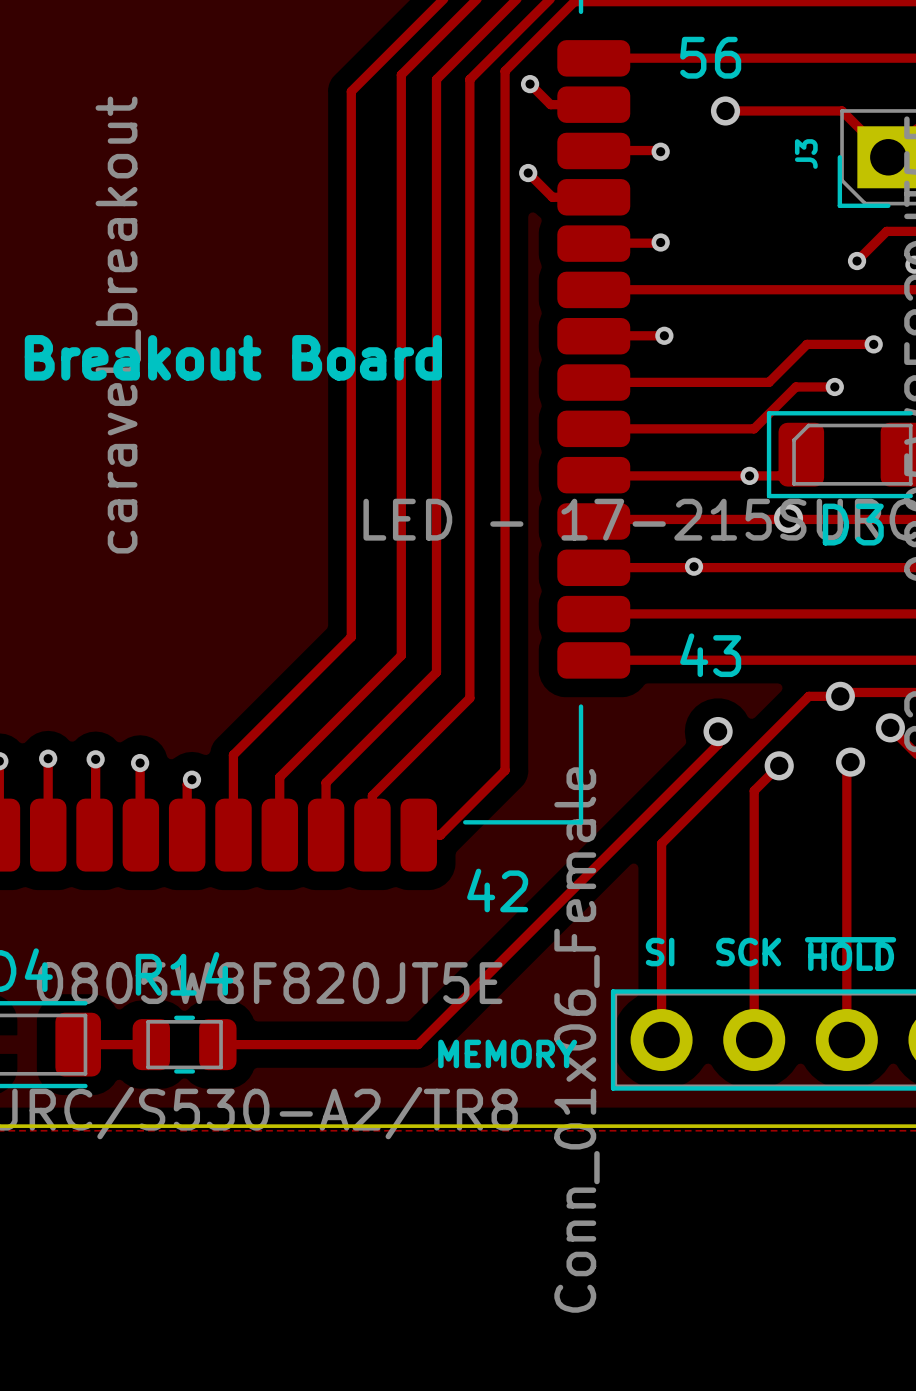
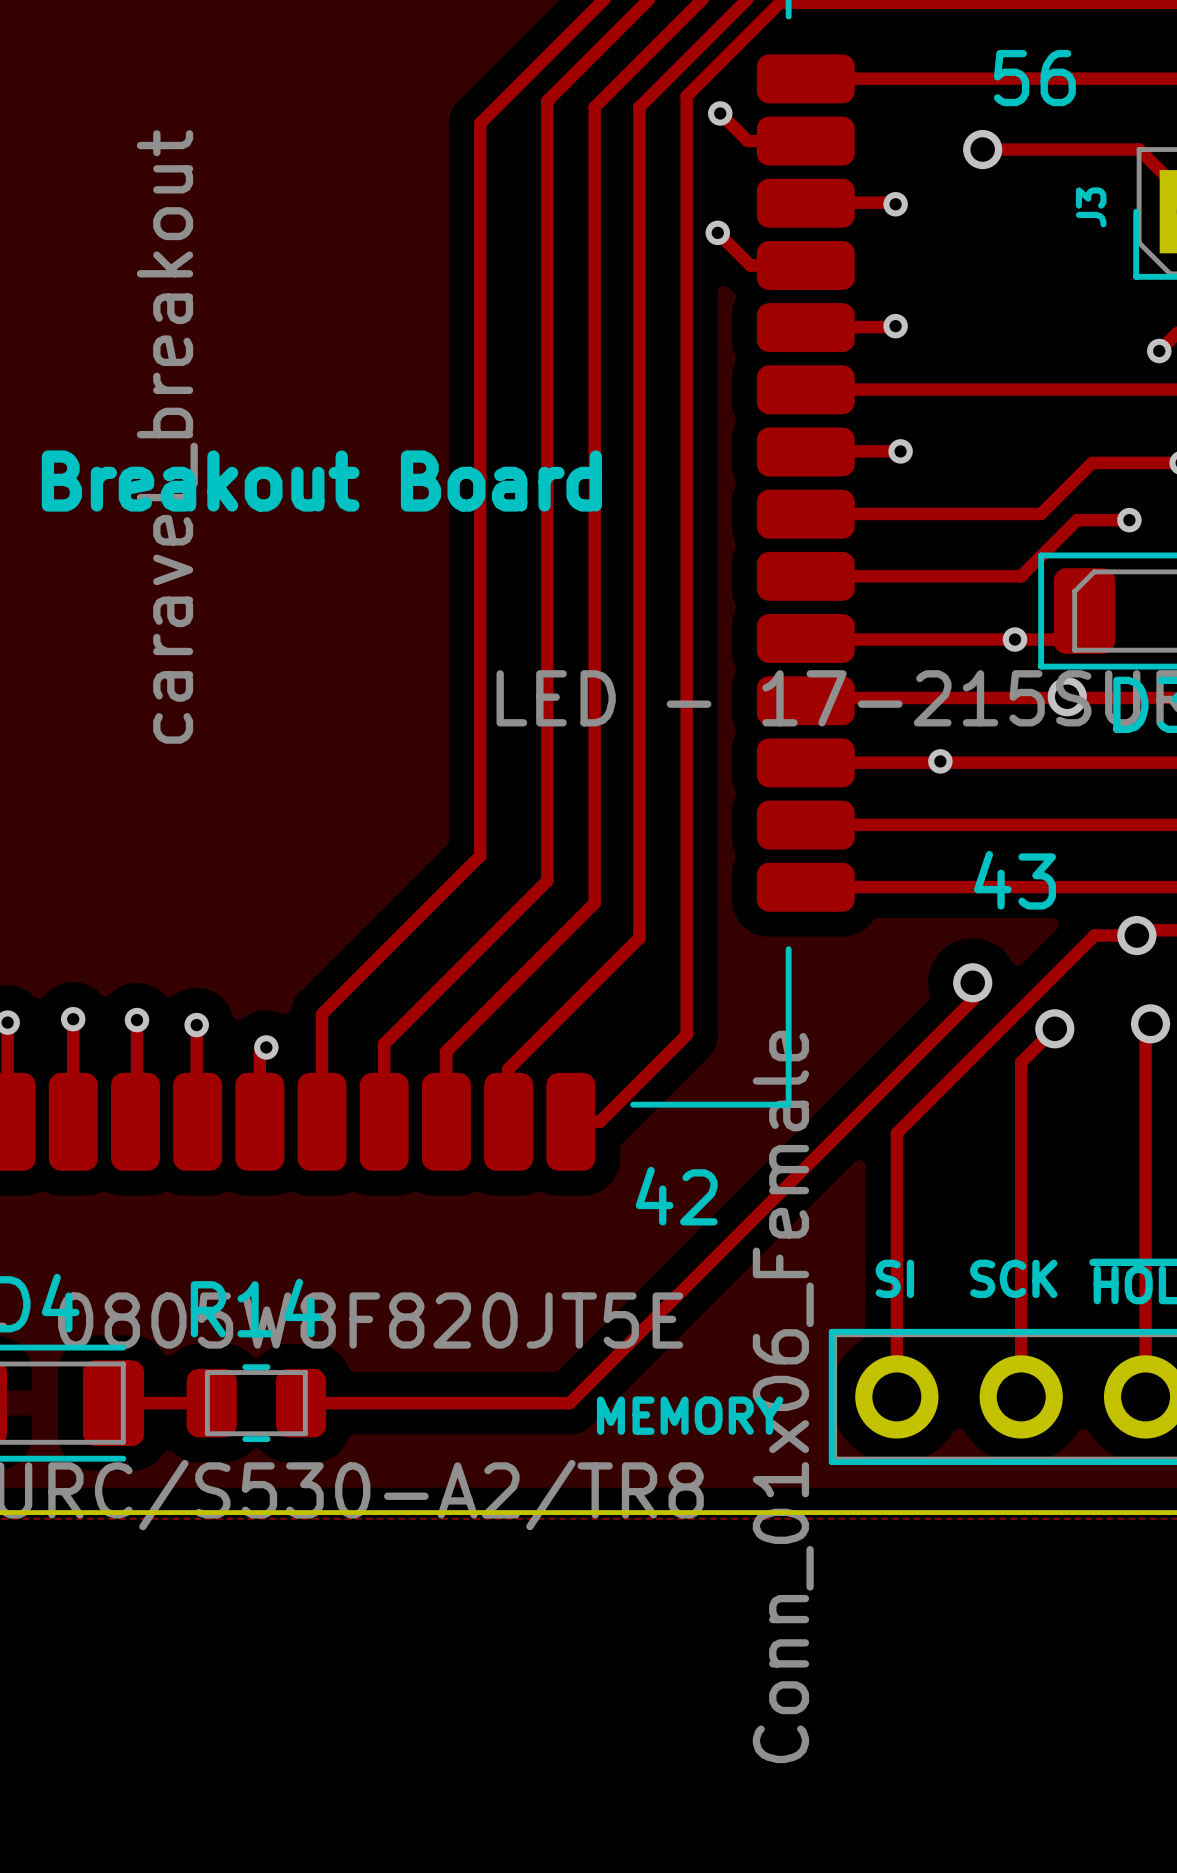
text position: 56 (710, 57) -> 56 (1034, 78)
text position: 43 (710, 655) -> 43 (1015, 880)

